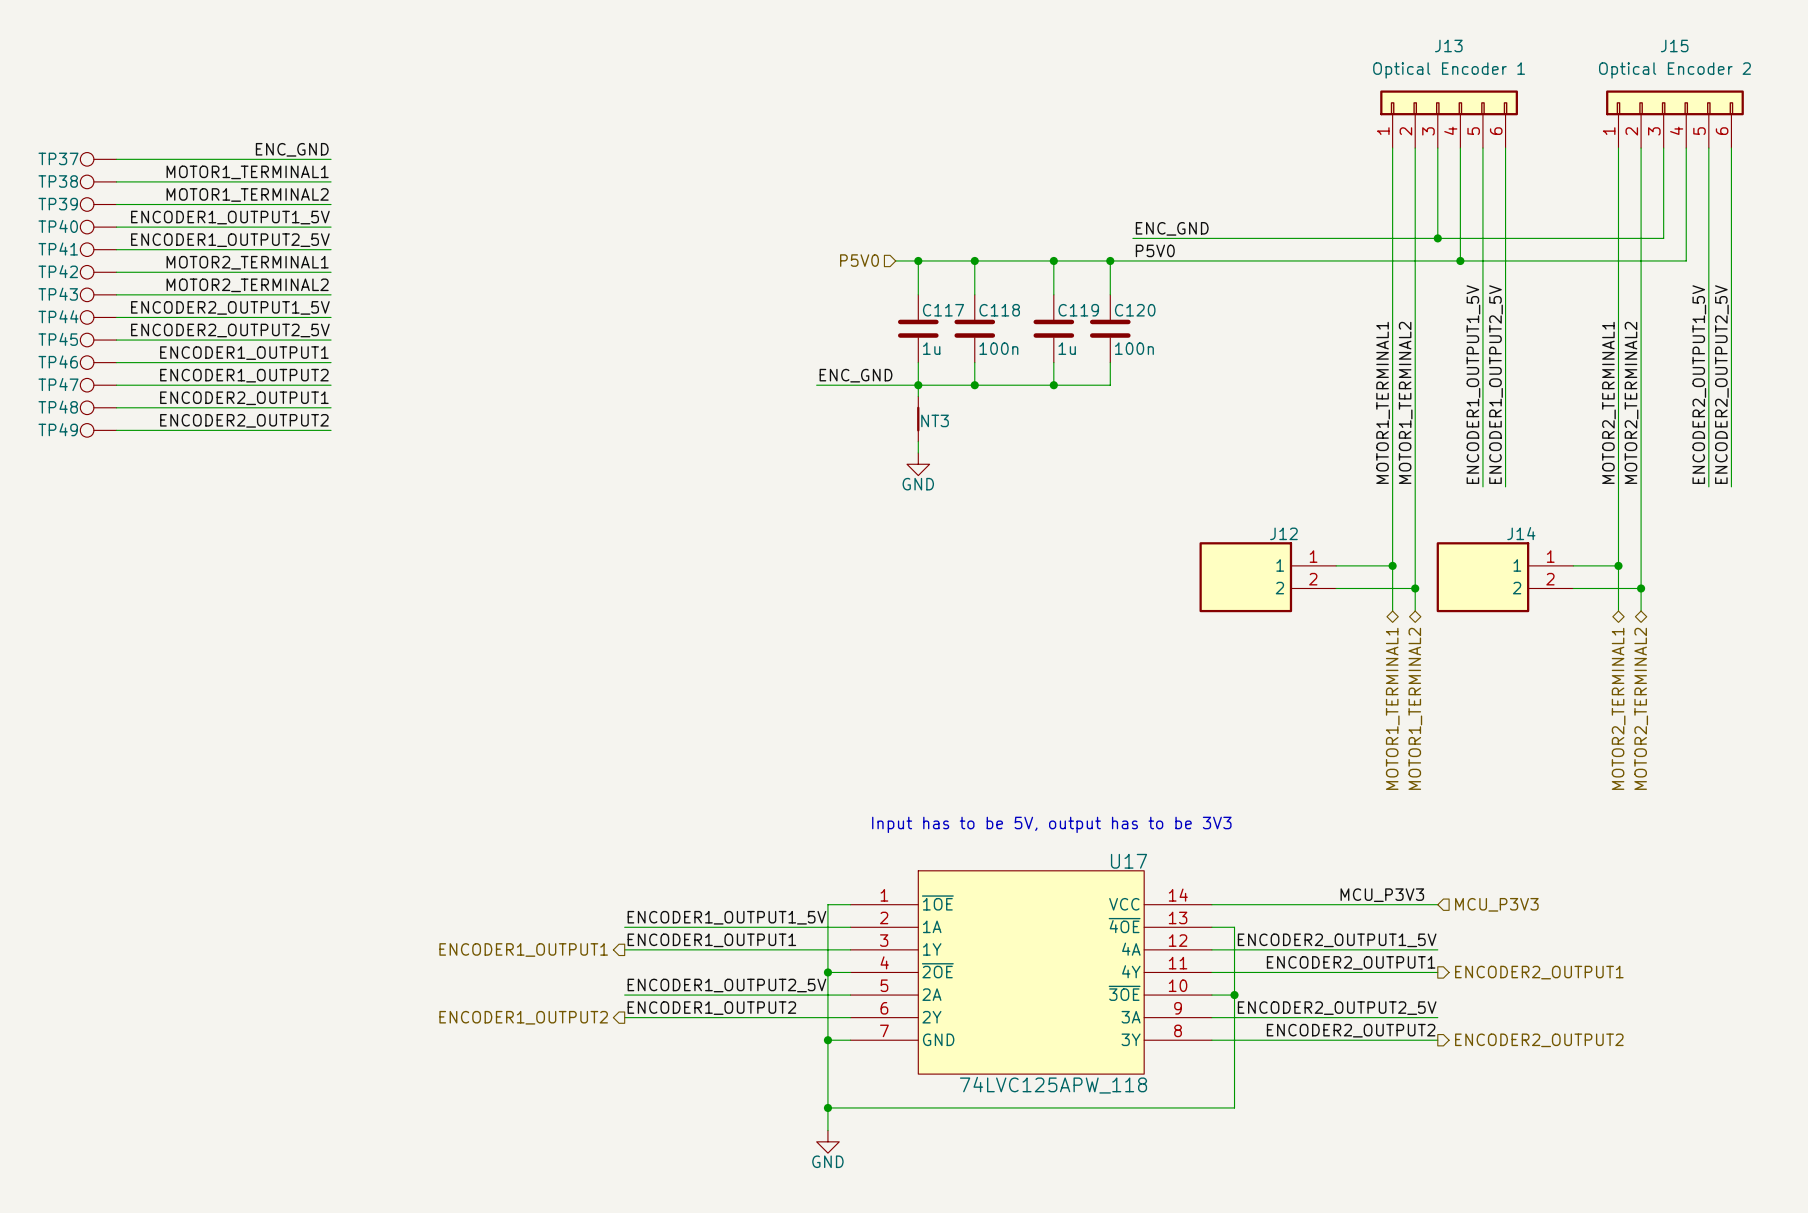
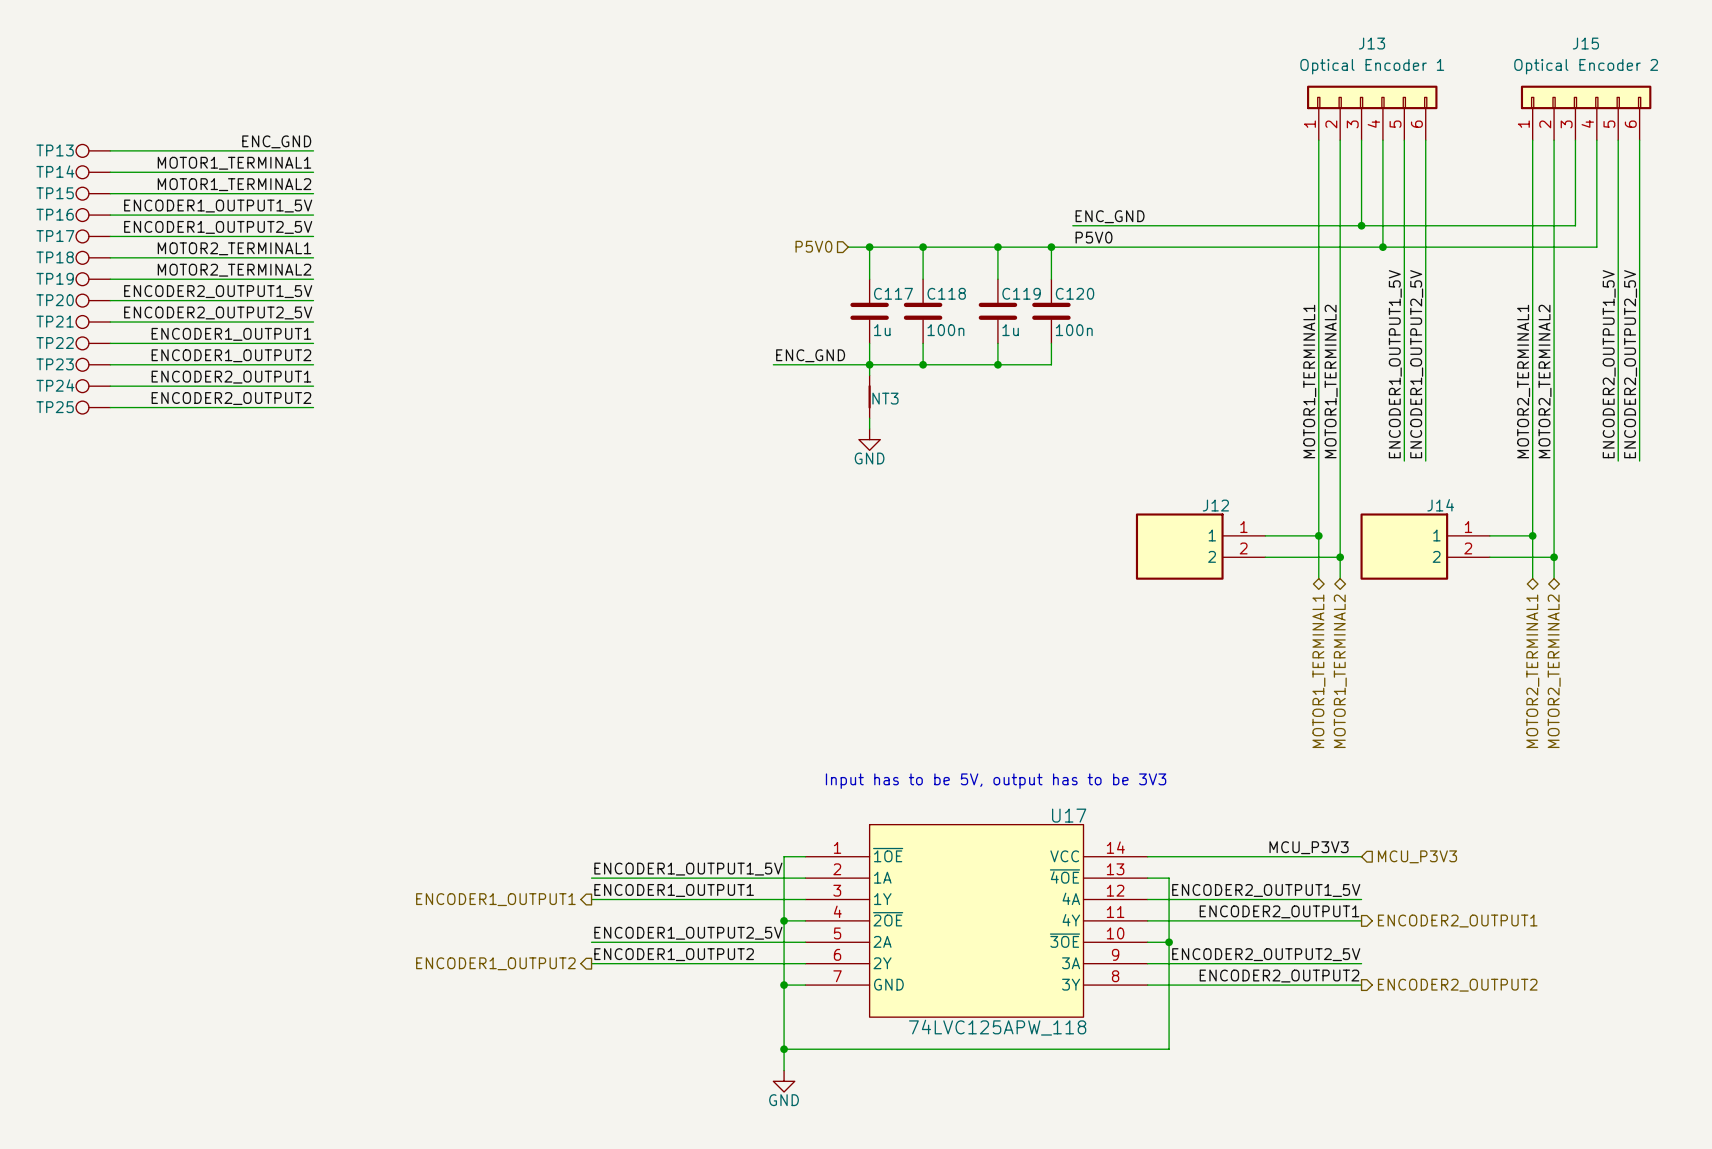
TP37 name: TP37 (58, 158) -> TP13 (55, 150)
TP38 name: TP38 (58, 181) -> TP14 (55, 171)
TP39 name: TP39 (58, 204) -> TP15 (55, 193)
TP40 name: TP40 (58, 226) -> TP16 (55, 214)
TP41 name: TP41 (58, 248) -> TP17 (55, 236)
TP42 name: TP42 (58, 271) -> TP18 (55, 257)
TP43 name: TP43 (58, 294) -> TP19 (55, 278)
TP44 name: TP44 (58, 316) -> TP20 (55, 300)
TP45 name: TP45 (58, 339) -> TP21 (55, 321)
TP46 name: TP46 (58, 361) -> TP22 (55, 342)
TP47 name: TP47 (58, 384) -> TP23 (55, 364)
TP48 name: TP48 (58, 407) -> TP24 (55, 385)
TP49 name: TP49 (58, 429) -> TP25 (55, 407)

